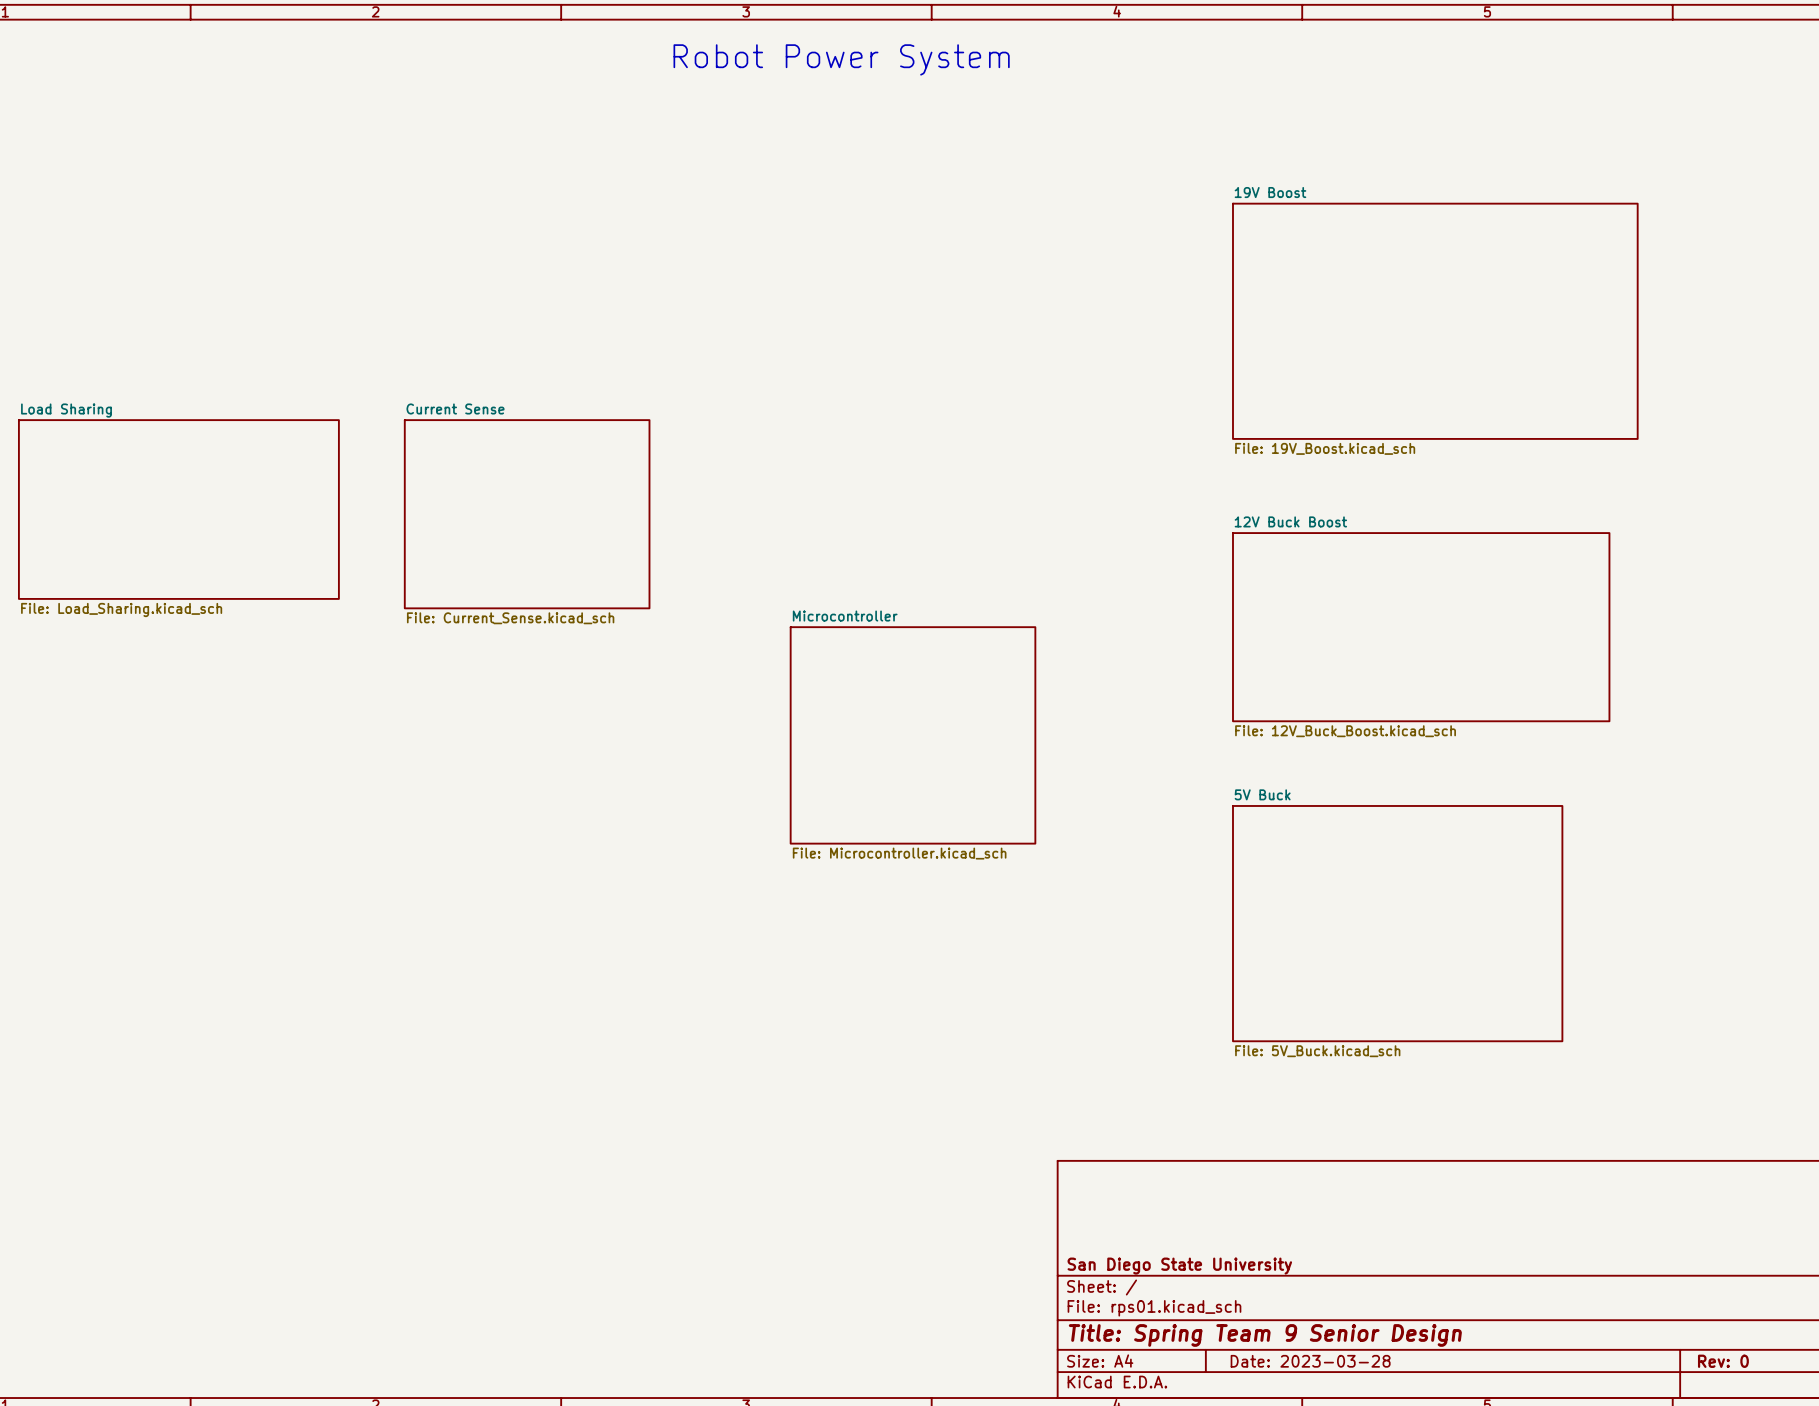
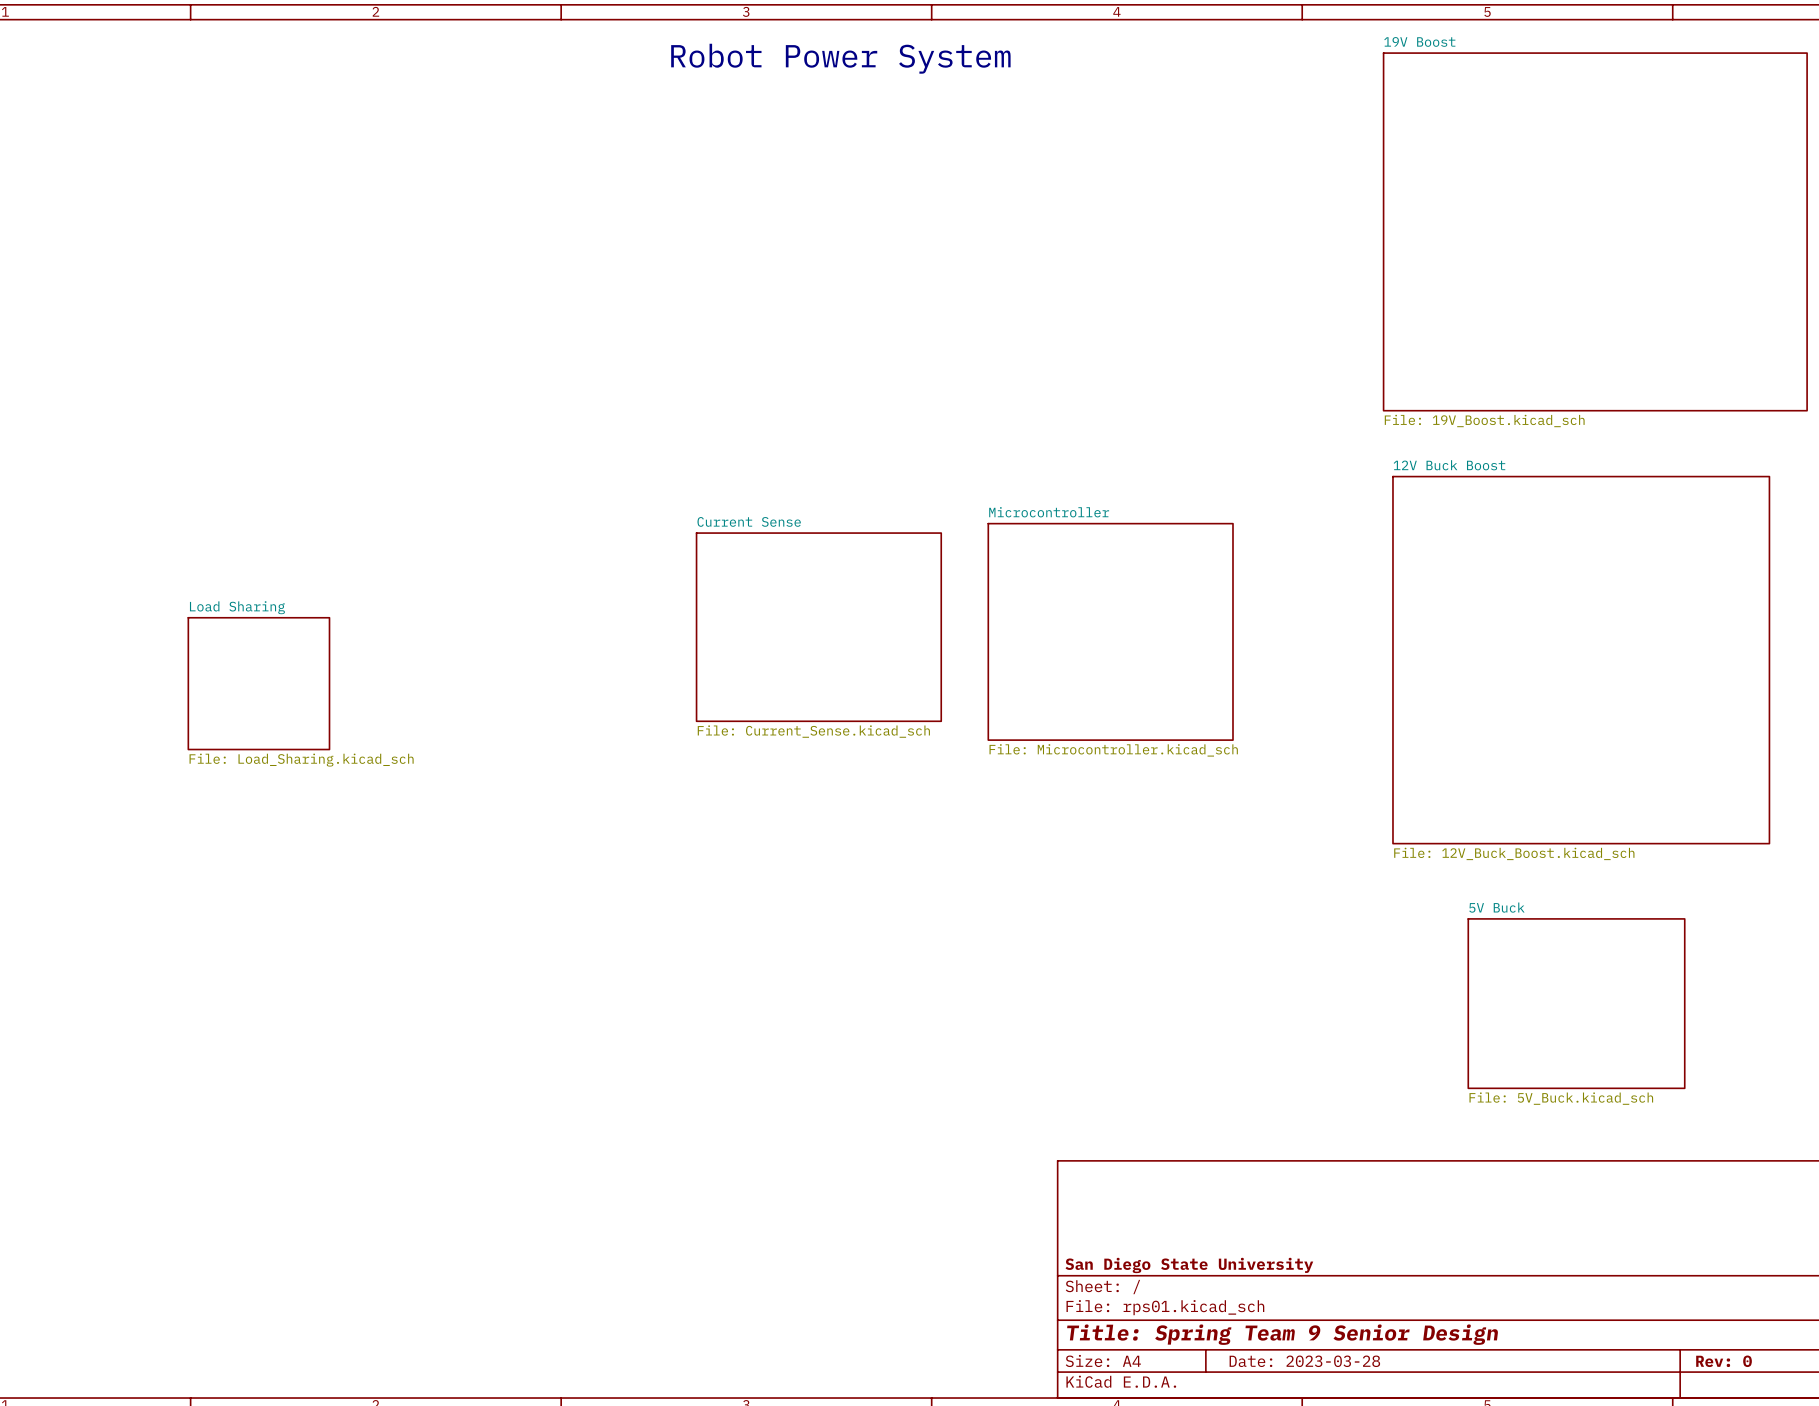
sheet 19V Boost name position: 19V Boost (1270, 192) -> 19V Boost (1419, 41)
sheet 19V Boost shape: [1232, 203, 1639, 440] -> [1383, 52, 1808, 412]
sheet 19V Boost value position: File: 19V_Boost.kicad_sch (1325, 448) -> File: 19V_Boost.kicad_sch (1484, 420)
sheet Load Sharing: File: Load_Sharing.kicad_sch (178, 509) -> none
sheet Current Sense: File: Current_Sense.kicad_sch (527, 514) -> none
sheet 12V Buck Boost name position: 12V Buck Boost (1290, 521) -> 12V Buck Boost (1449, 465)
sheet 12V Buck Boost shape: [1232, 532, 1611, 722] -> [1392, 476, 1771, 845]
sheet Current Sense: none -> File: Current_Sense.kicad_sch (818, 627)
sheet Microcontroller: none -> File: Microcontroller.kicad_sch (1110, 631)
sheet Load Sharing: none -> File: Load_Sharing.kicad_sch (258, 683)
sheet 12V Buck Boost value position: File: 12V_Buck_Boost.kicad_sch (1345, 731) -> File: 12V_Buck_Boost.kicad_sch (1514, 853)
sheet Microcontroller: File: Microcontroller.kicad_sch (913, 735) -> none
sheet 5V Buck name position: 5V Buck (1262, 794) -> 5V Buck (1496, 907)
sheet 5V Buck shape: [1232, 805, 1563, 1042] -> [1467, 918, 1686, 1089]
sheet 5V Buck value position: File: 5V_Buck.kicad_sch (1317, 1051) -> File: 5V_Buck.kicad_sch (1561, 1098)

